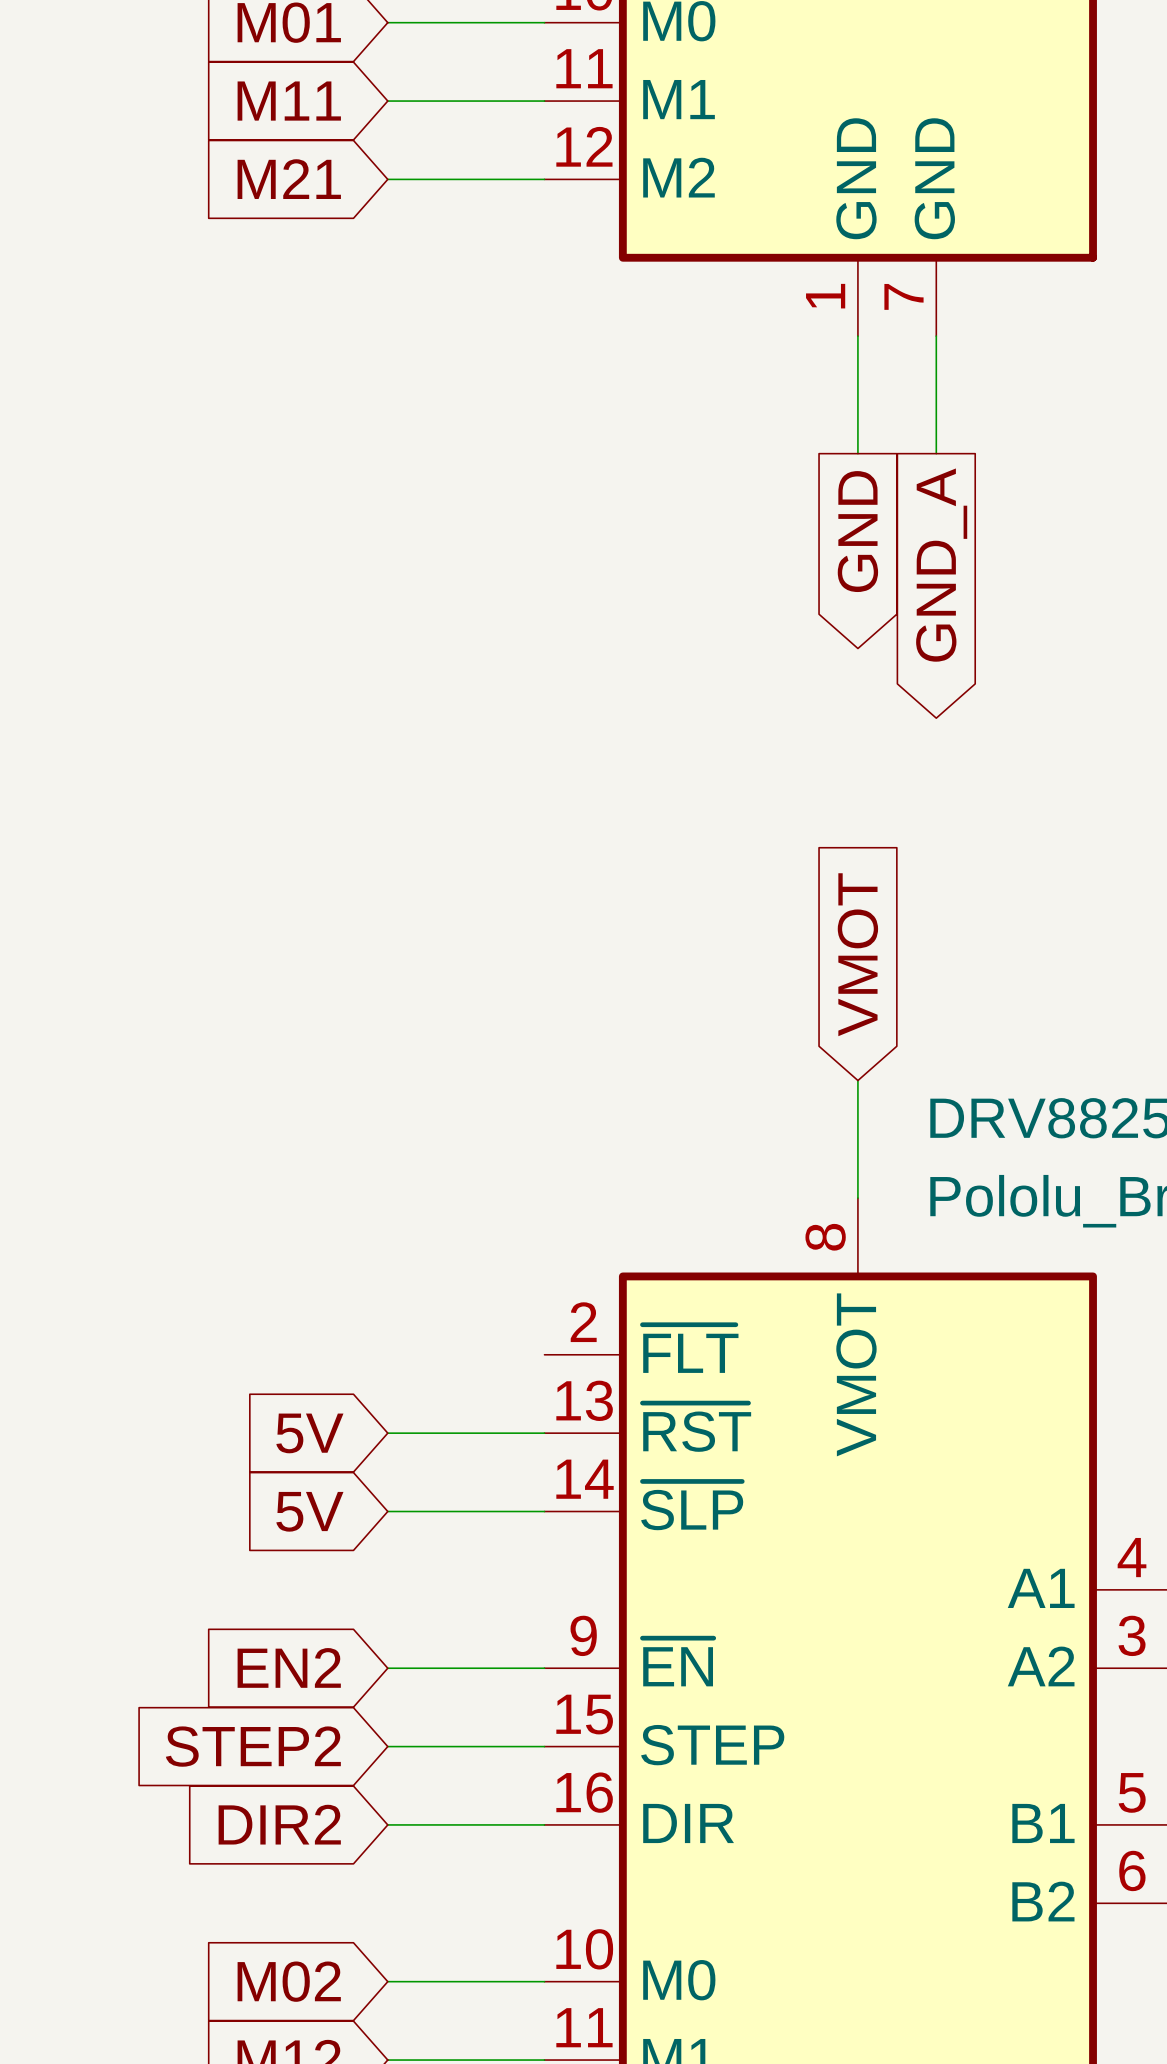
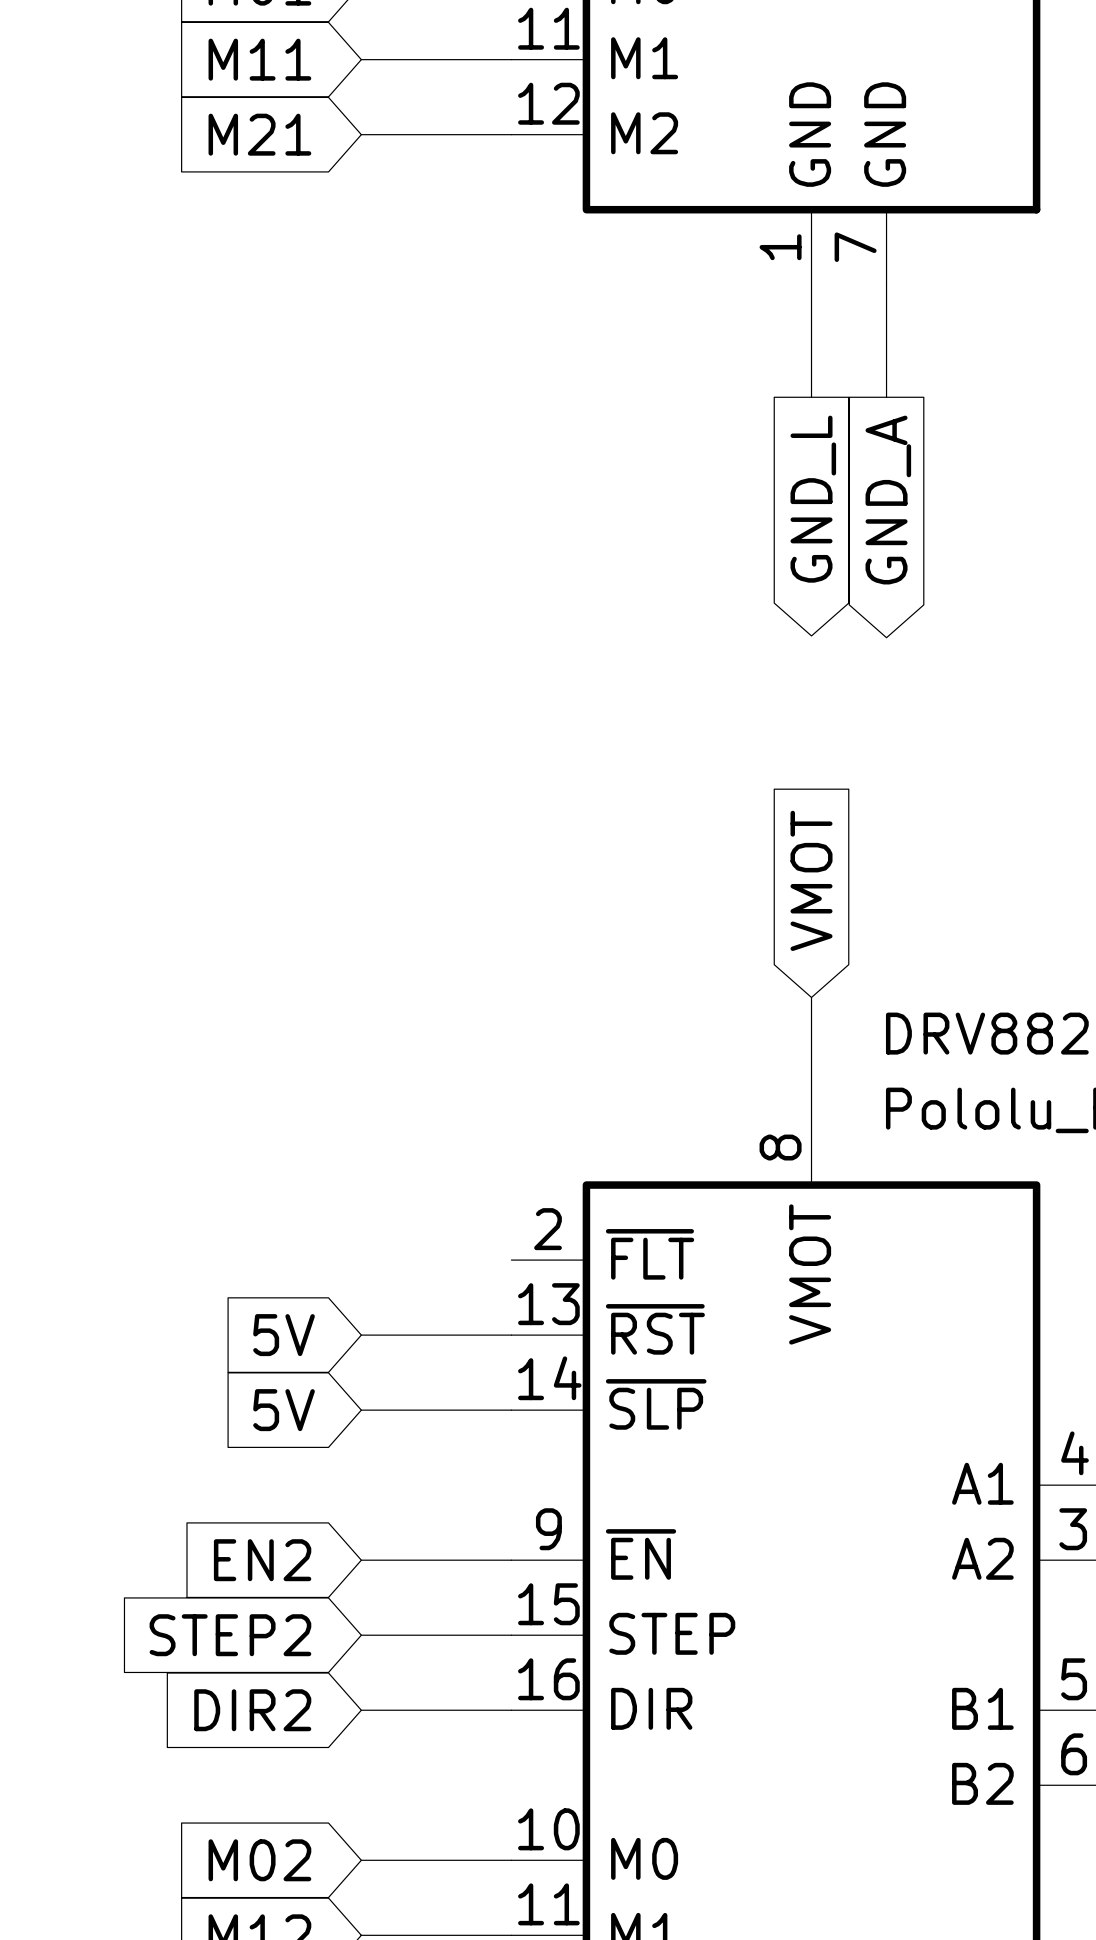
global label: GND (857, 531) -> GND_L (813, 499)

